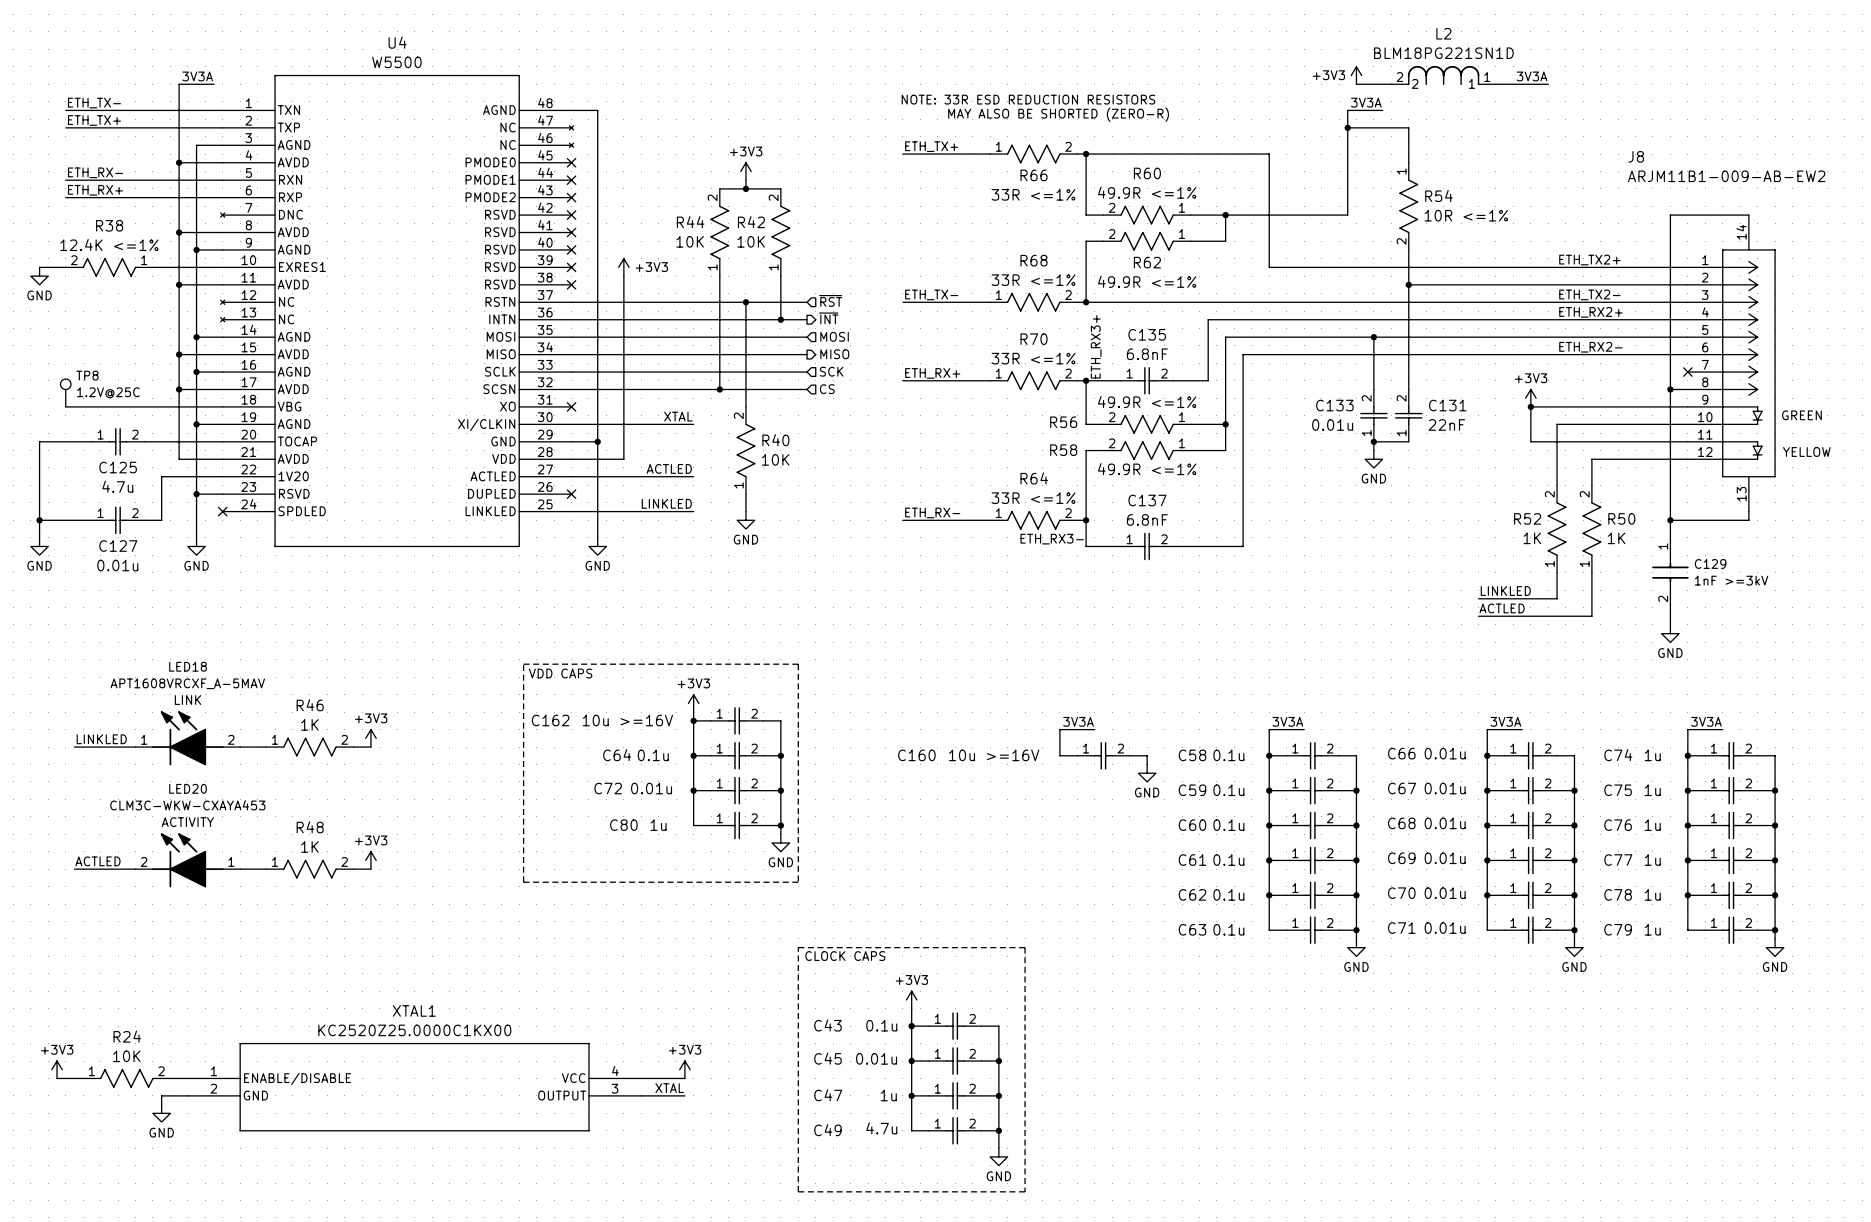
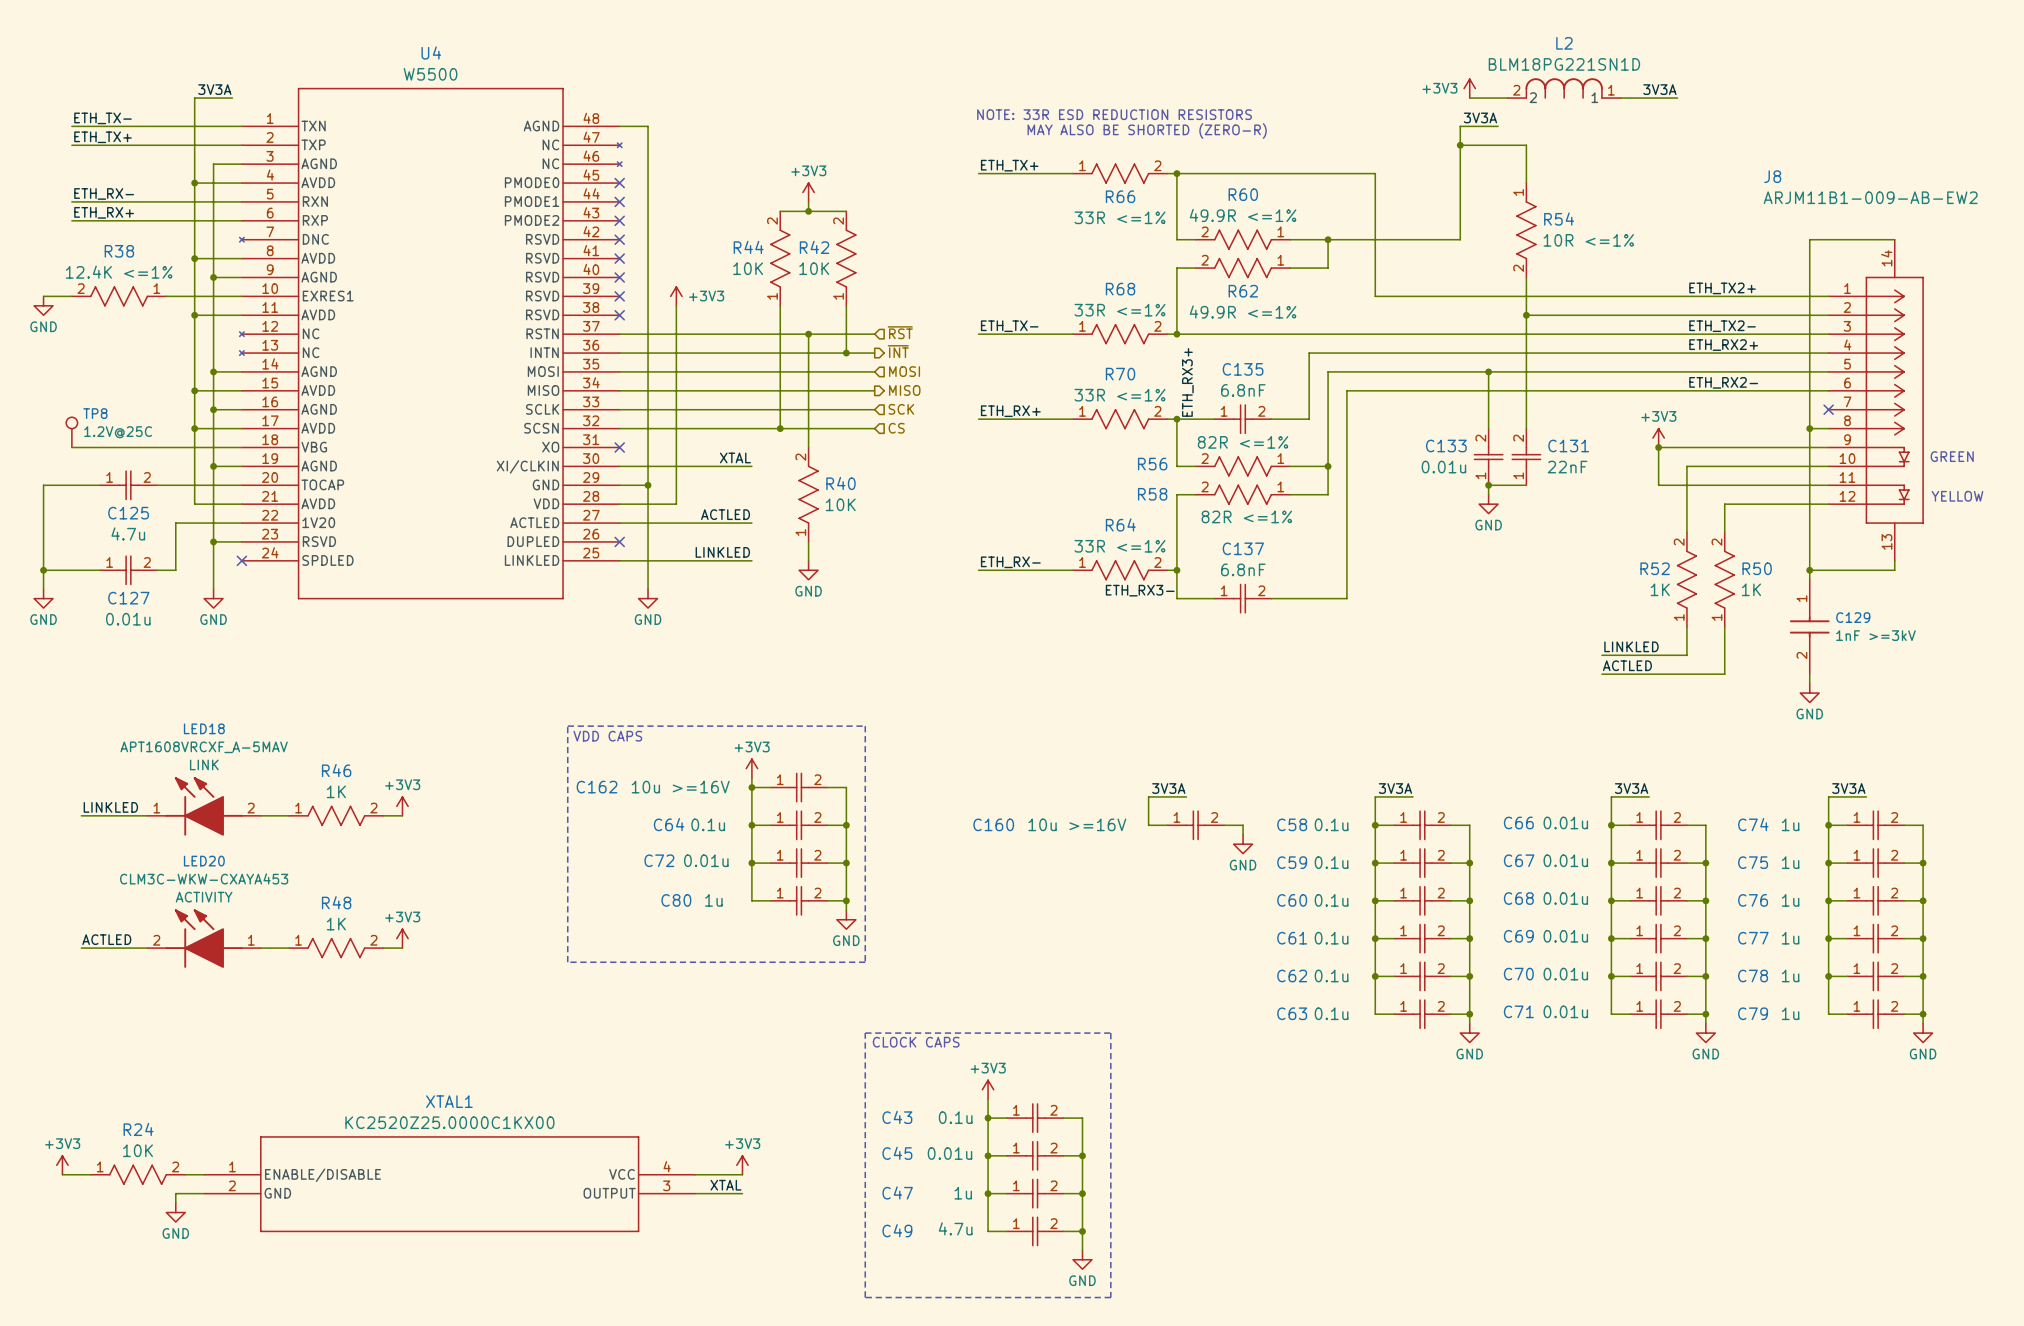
R56 value: 49.9R <=1% (1147, 401) -> 82R <=1% (1243, 442)
R58 value: 49.9R <=1% (1147, 469) -> 82R <=1% (1246, 516)

